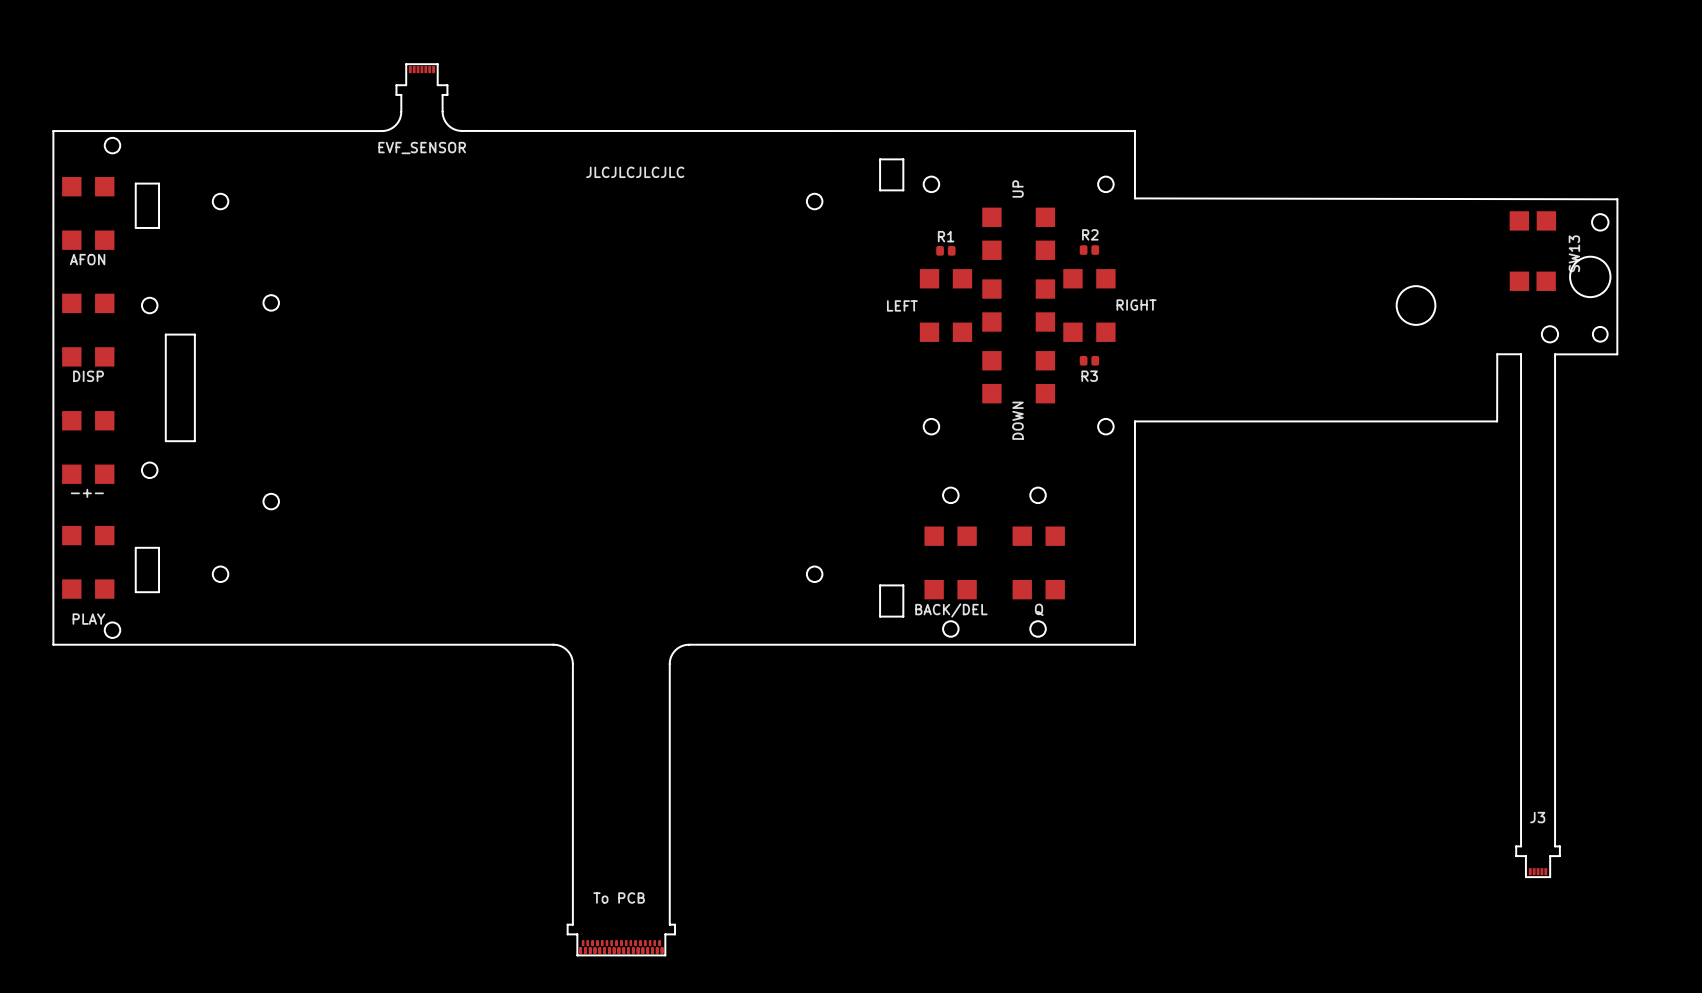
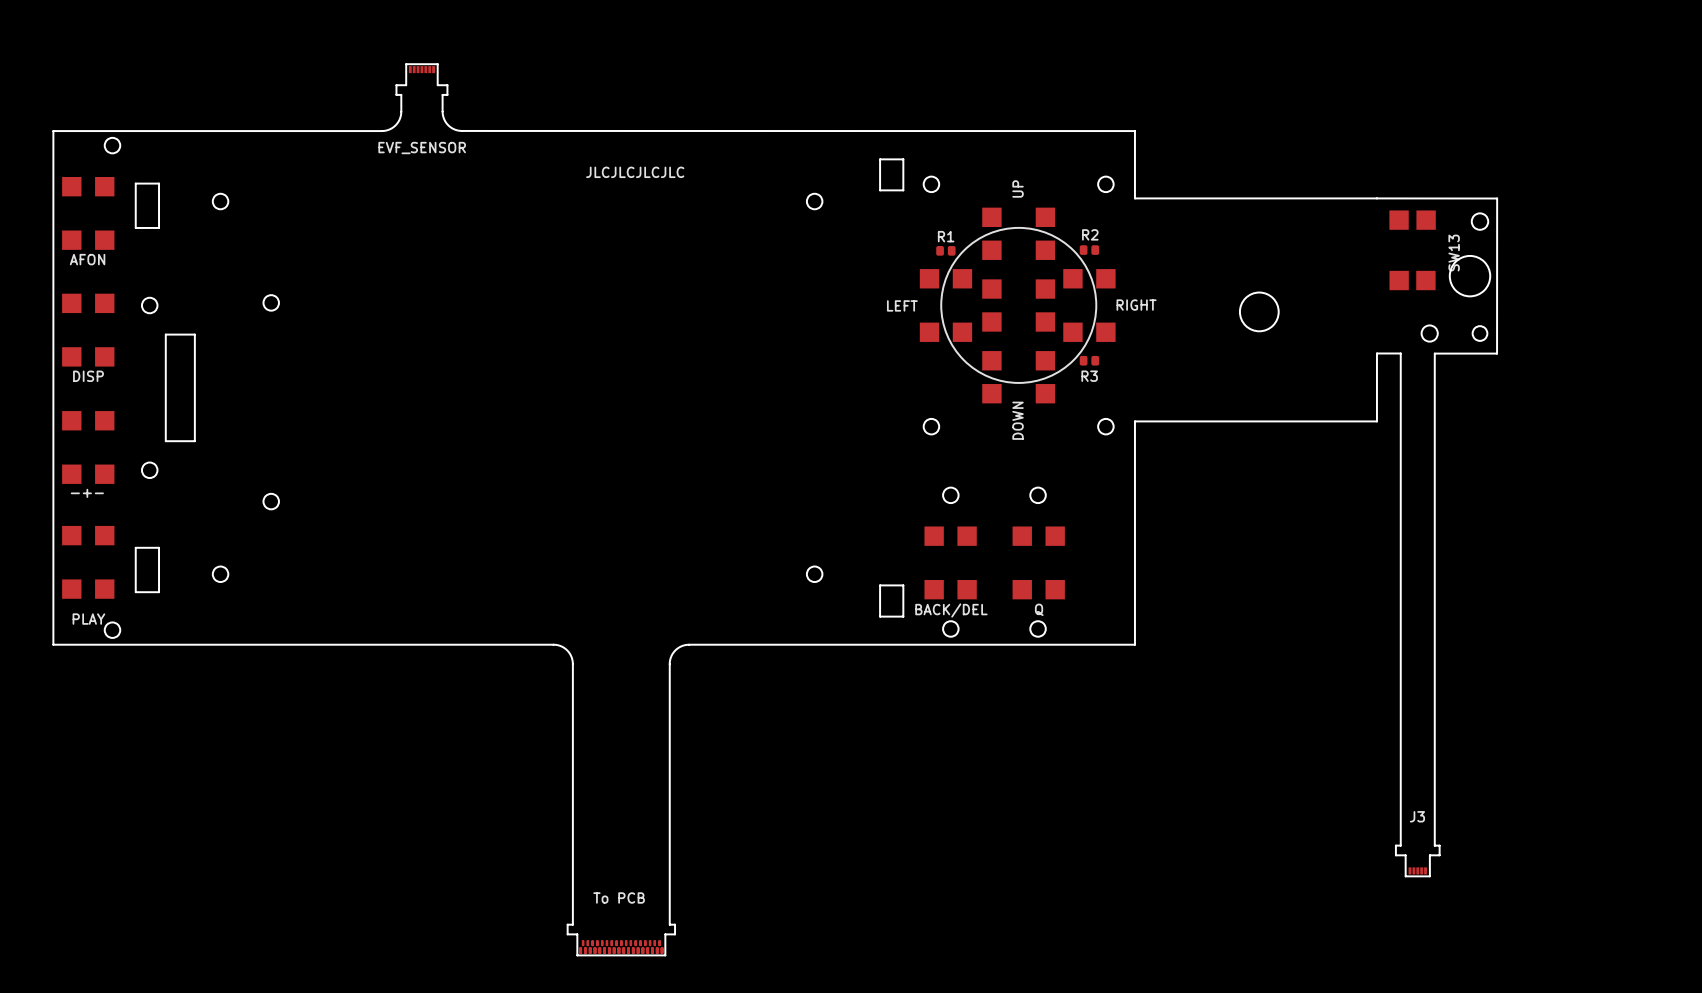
board edge: (1134, 198) (1617, 199) (1617, 354) (1555, 354) (1555, 846) -> (1134, 198) (1497, 198) (1497, 353) (1434, 353) (1434, 845)
round board edge position: (1600, 222) -> (1479, 221)
drawing: none -> [940, 227, 1097, 384]
SW13 position: (1532, 251) -> (1412, 250)
round board edge position: (1590, 276) -> (1470, 276)
part position: (1416, 305) -> (1259, 311)
round board edge position: (1549, 334) -> (1429, 333)
round board edge position: (1600, 334) -> (1479, 333)
board edge: (1376, 421) (1497, 421) (1497, 354) (1521, 354) (1521, 846) -> (1376, 421) (1376, 353) (1400, 353) (1400, 845)
J3 position: (1538, 861) -> (1417, 860)

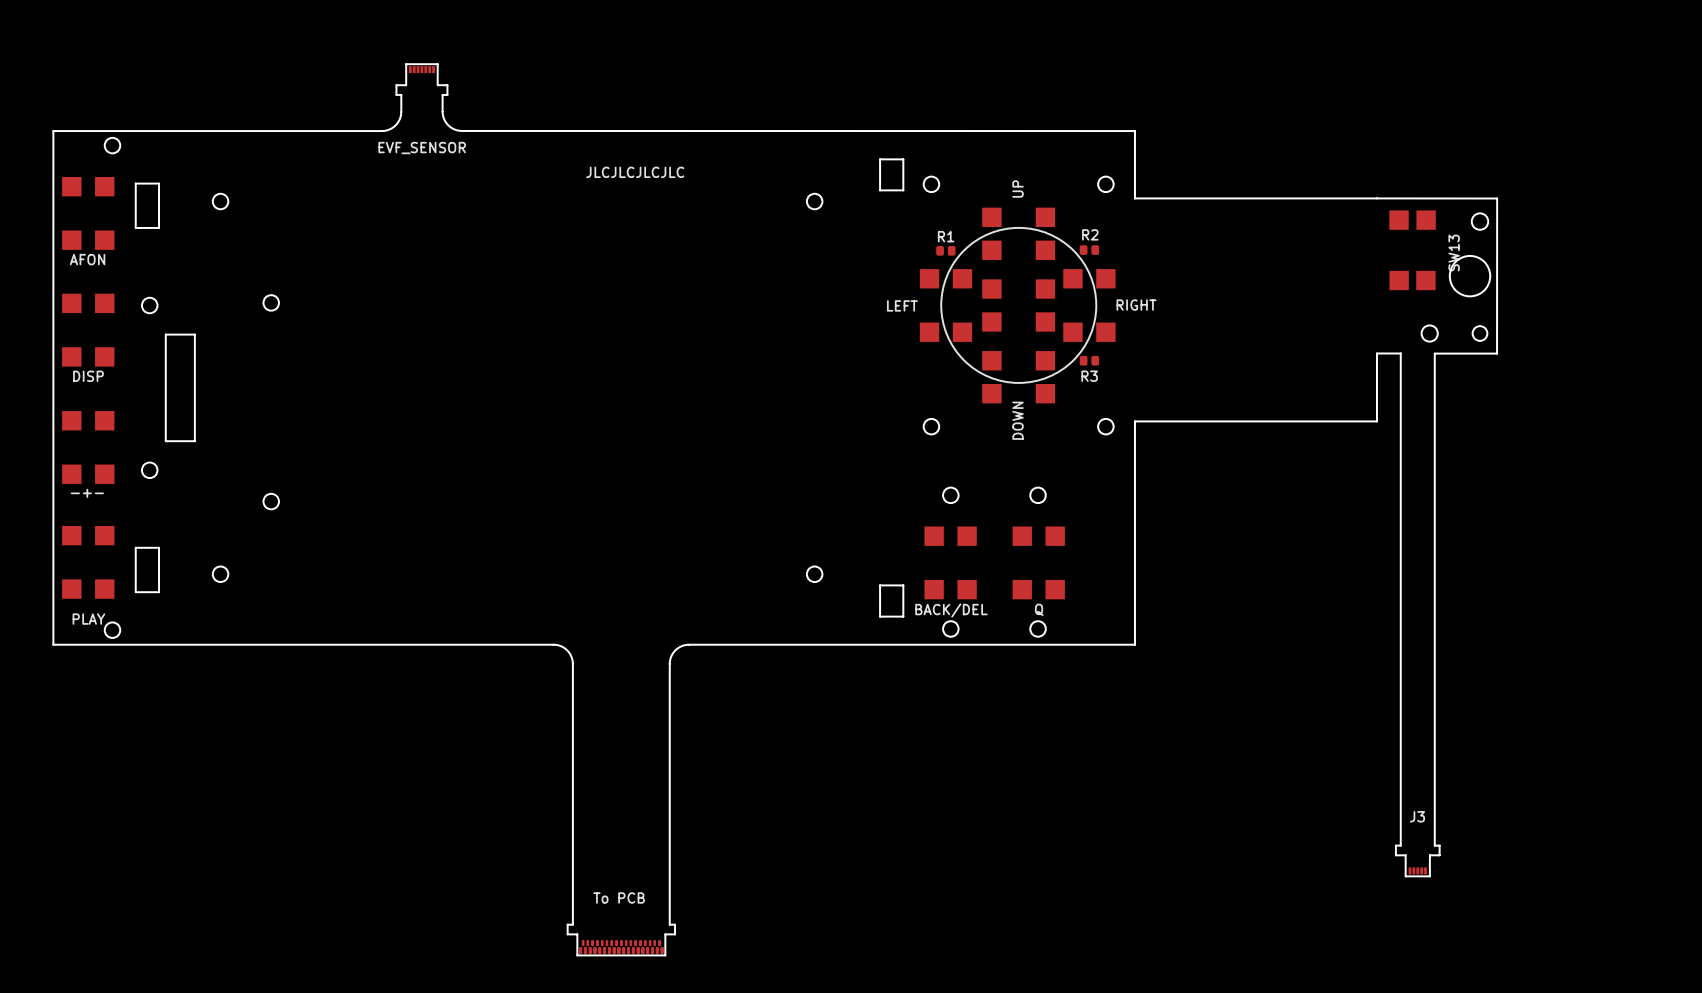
part: (1259, 311) -> none

